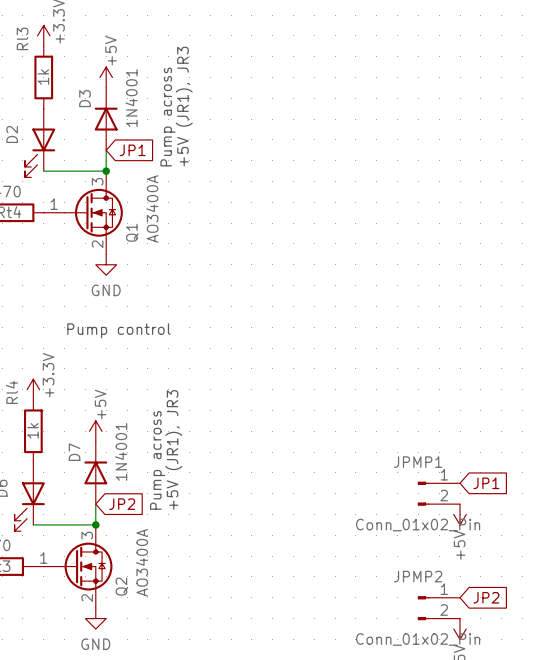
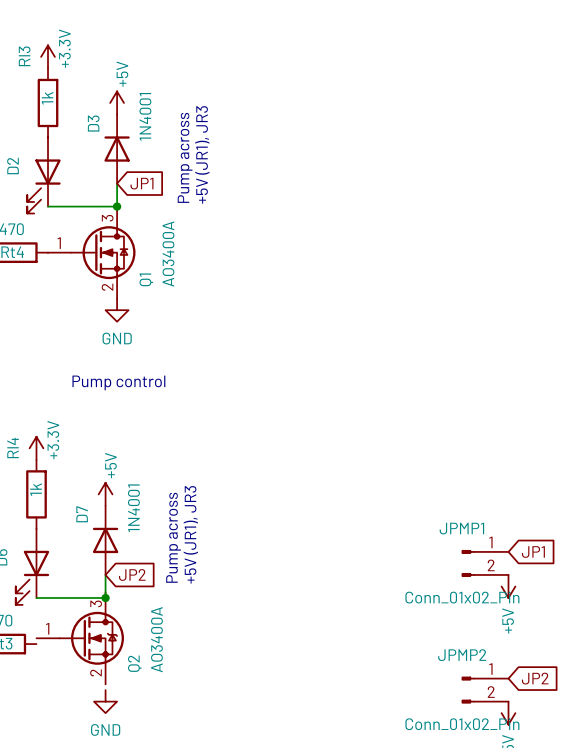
Q2 symbol: [33, 524, 113, 609] -> [36, 592, 124, 685]

